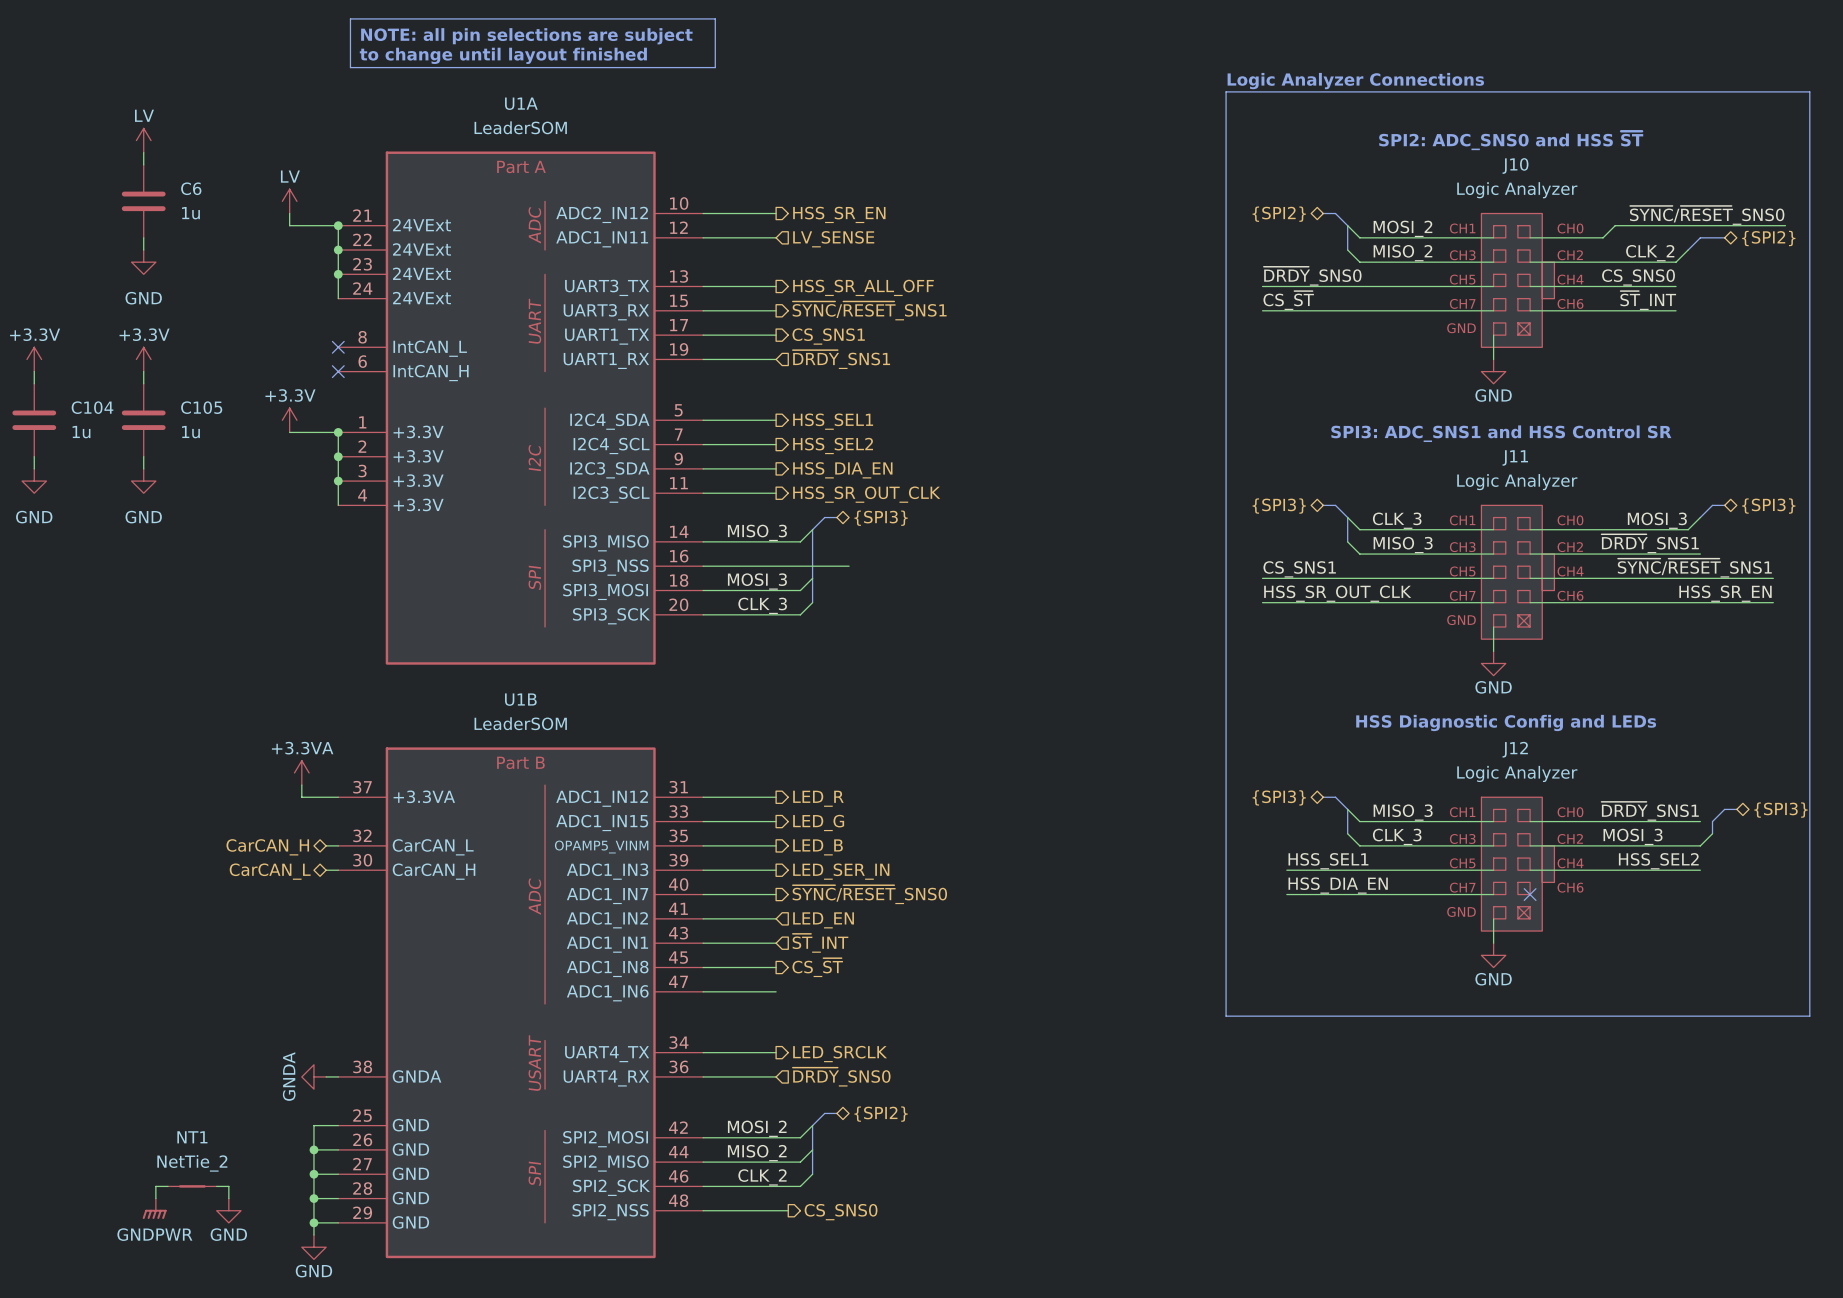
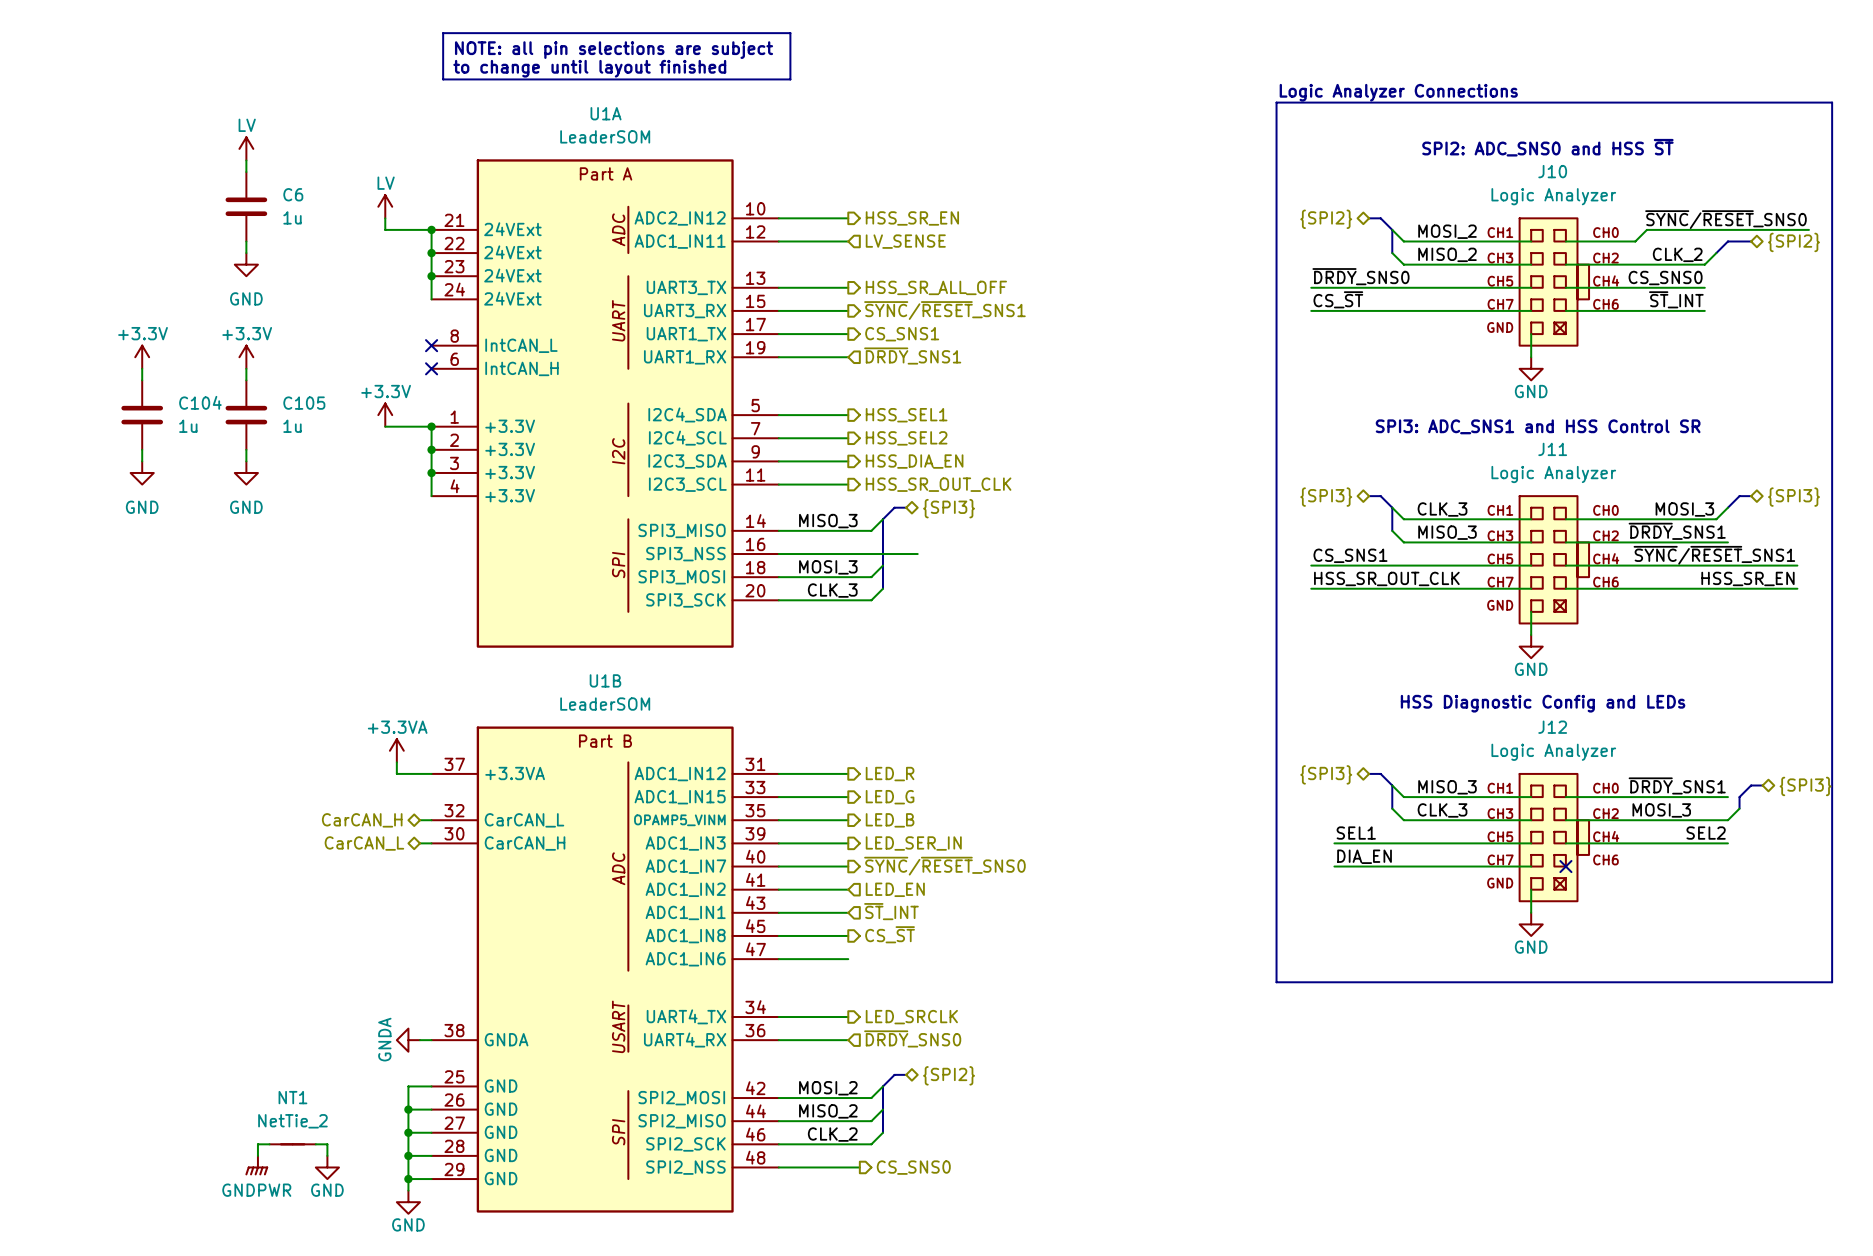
label: HSS_SEL1 (1328, 861) -> SEL1 (1356, 833)
label: HSS_SEL2 (1658, 861) -> SEL2 (1706, 833)
label: HSS_DIA_EN (1338, 885) -> DIA_EN (1364, 856)

